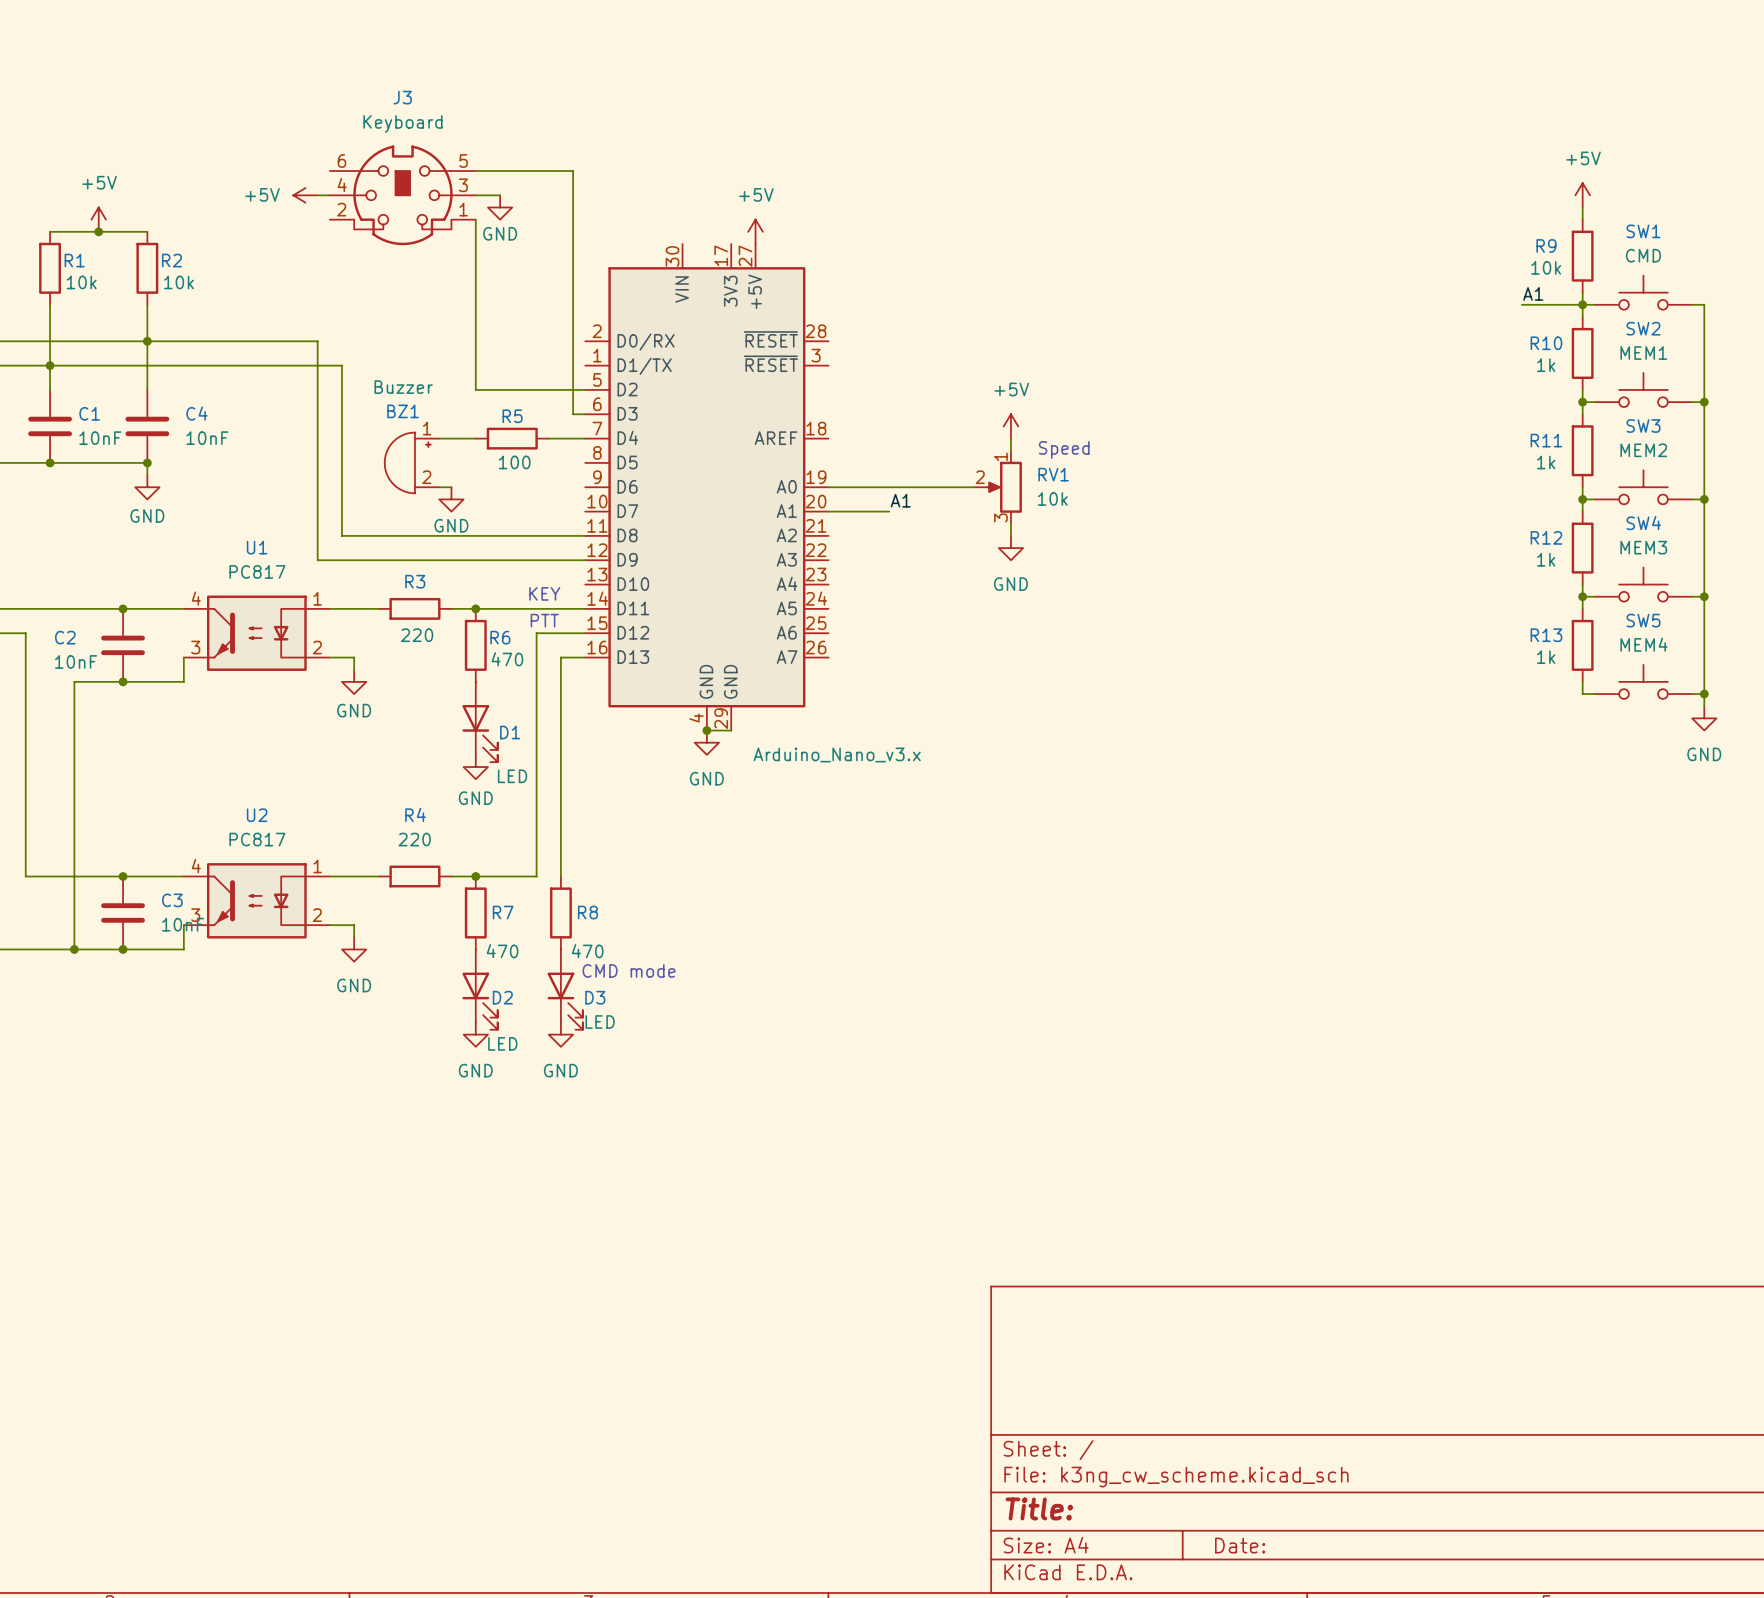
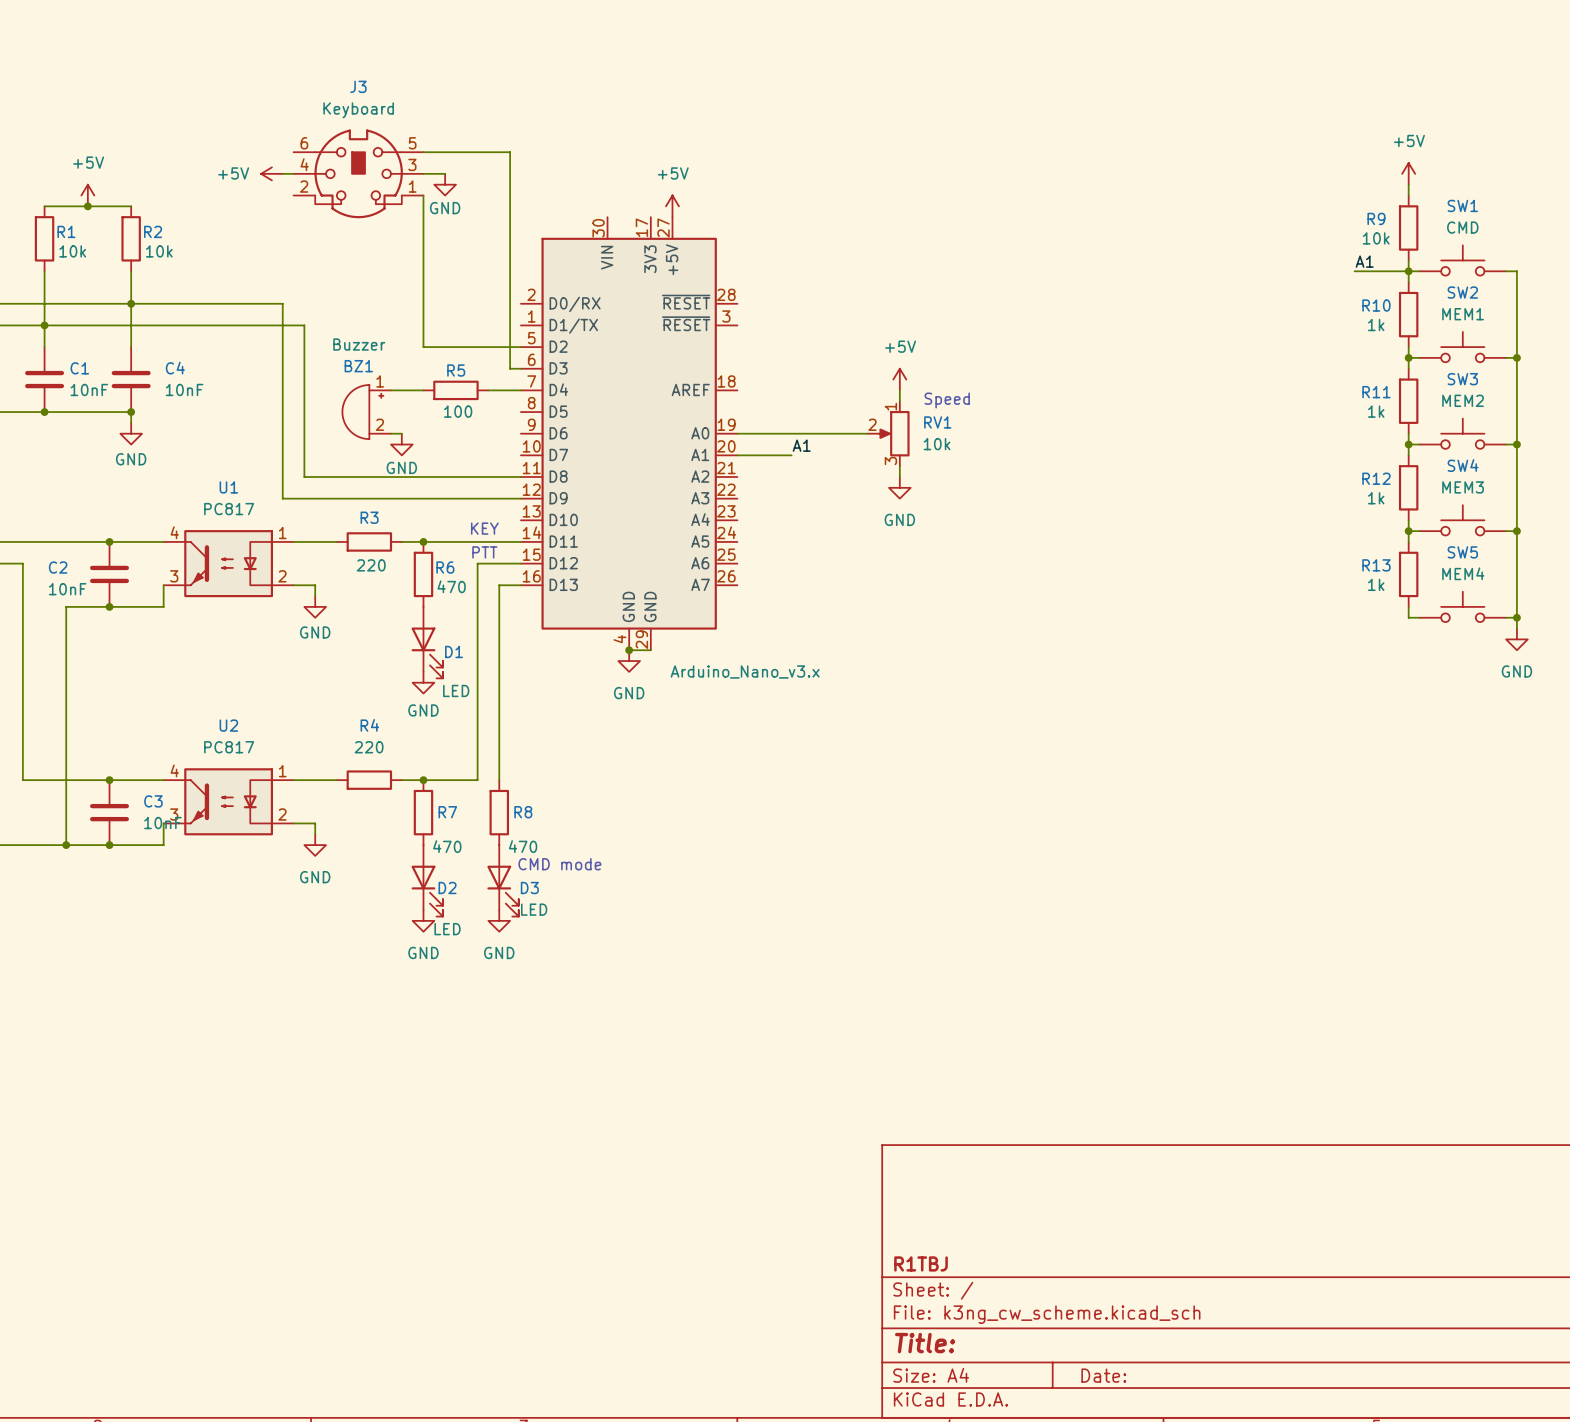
title block: none -> R1TBJ (921, 1263)

